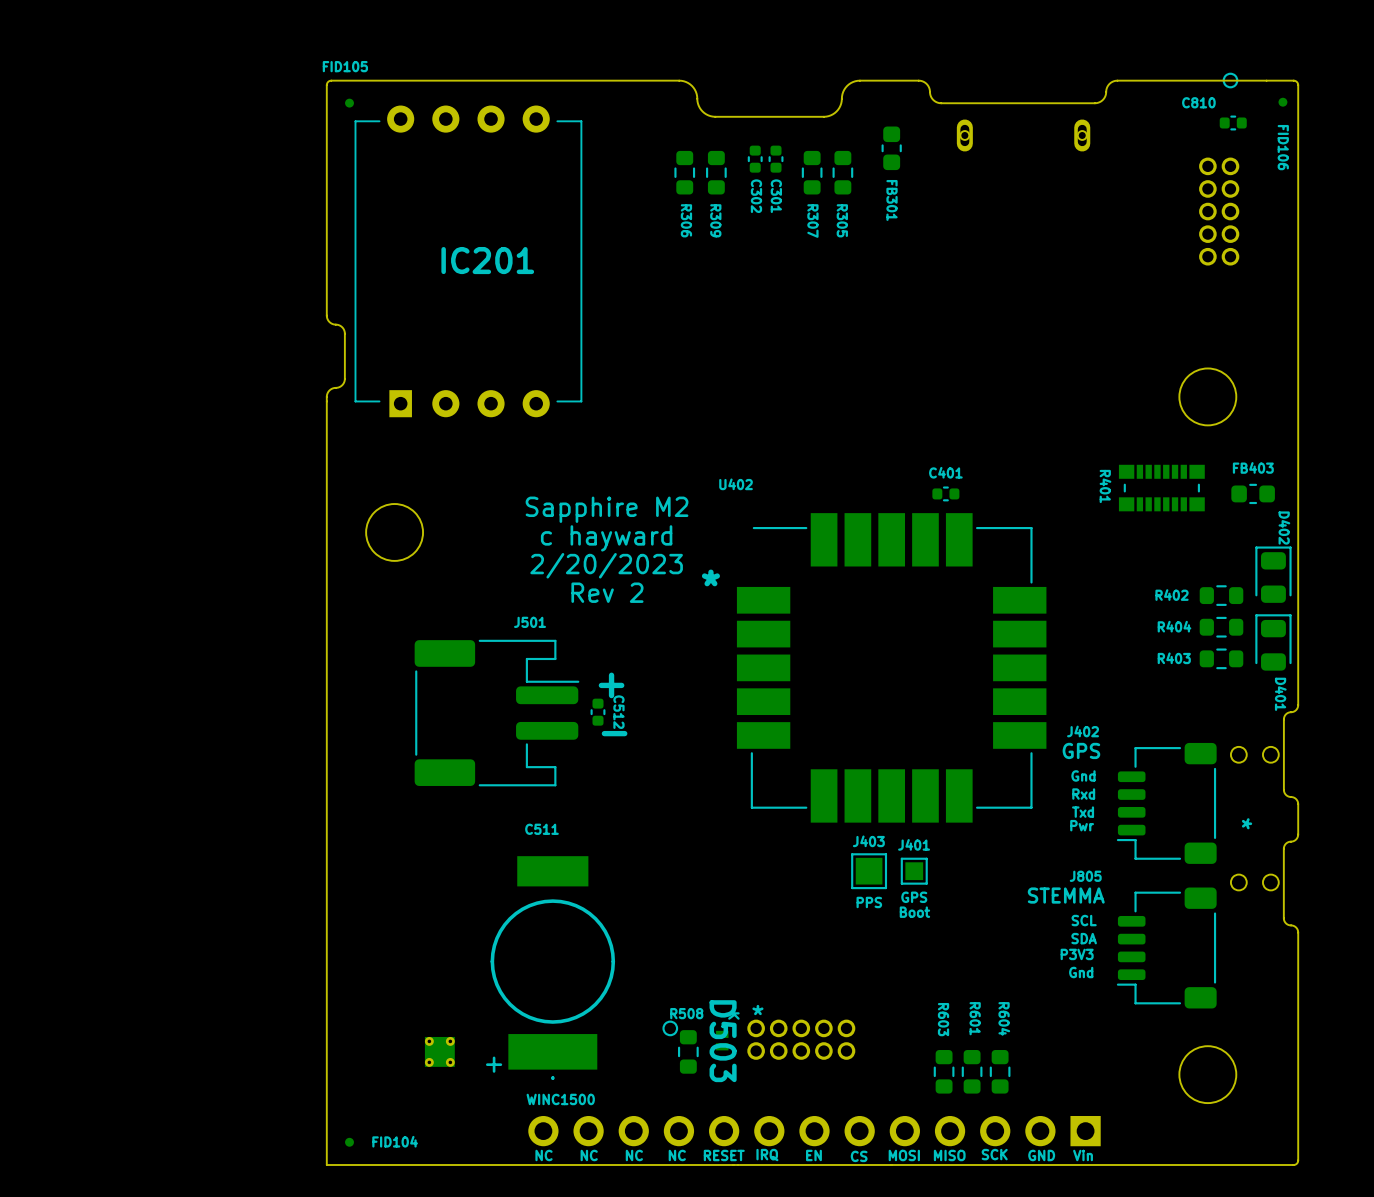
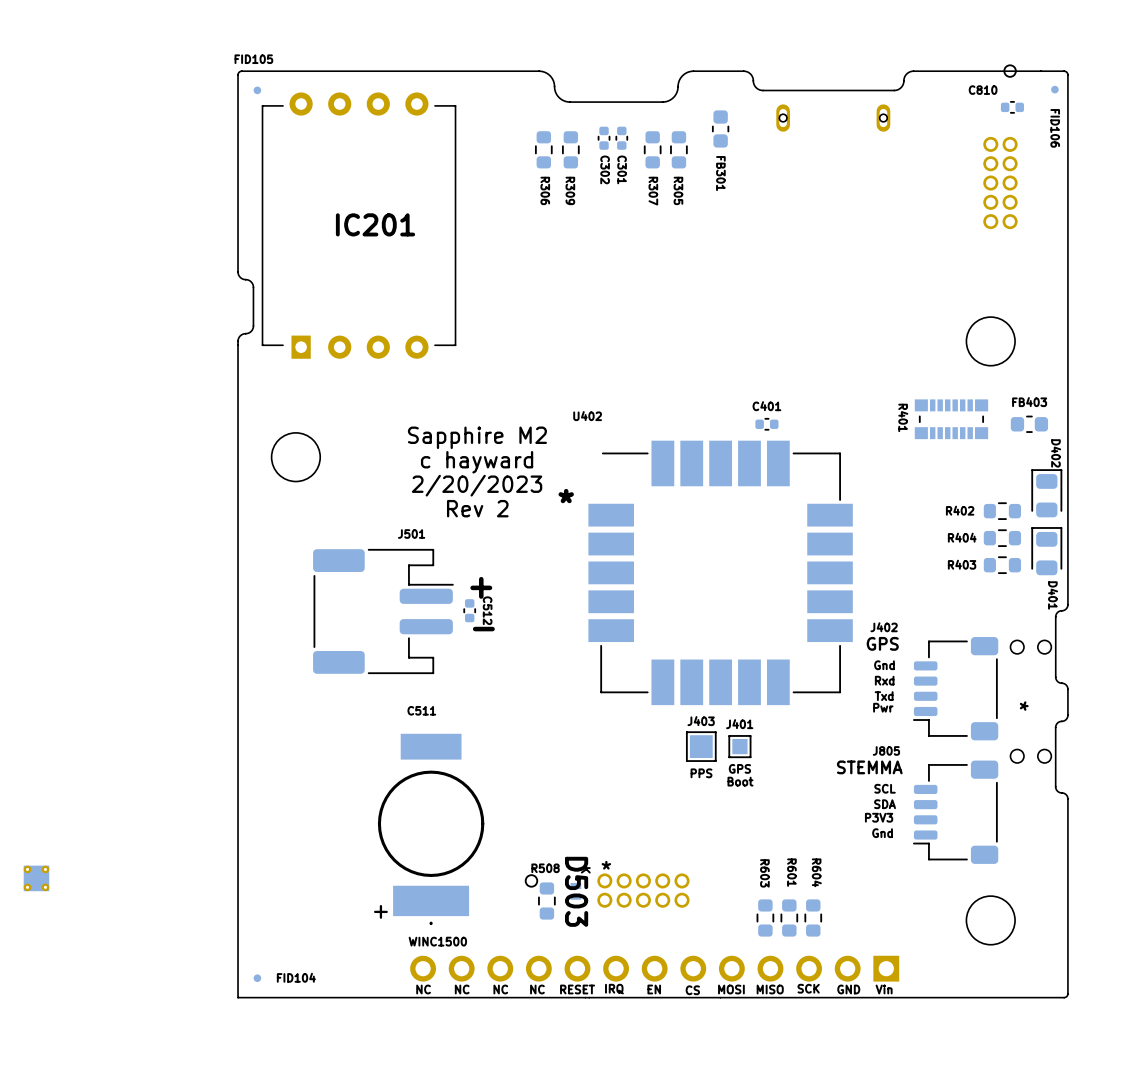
part position: (439, 1051) -> (36, 878)

